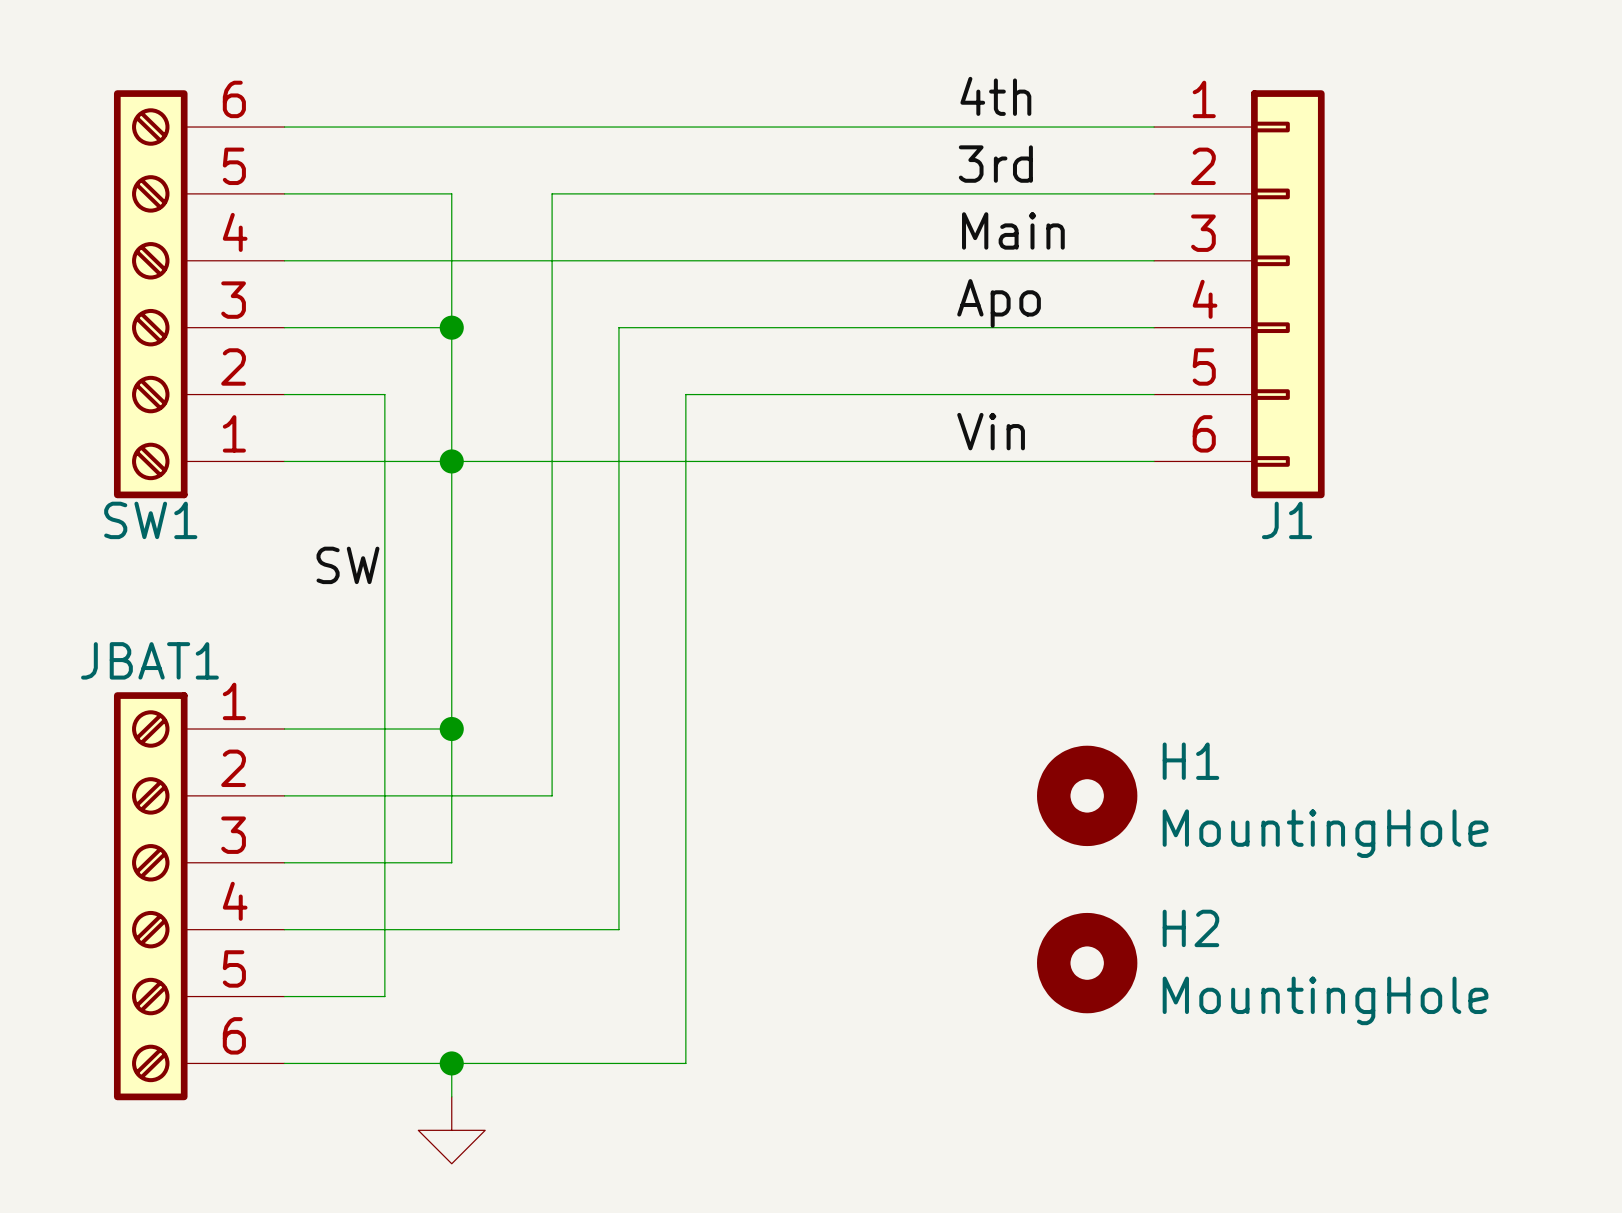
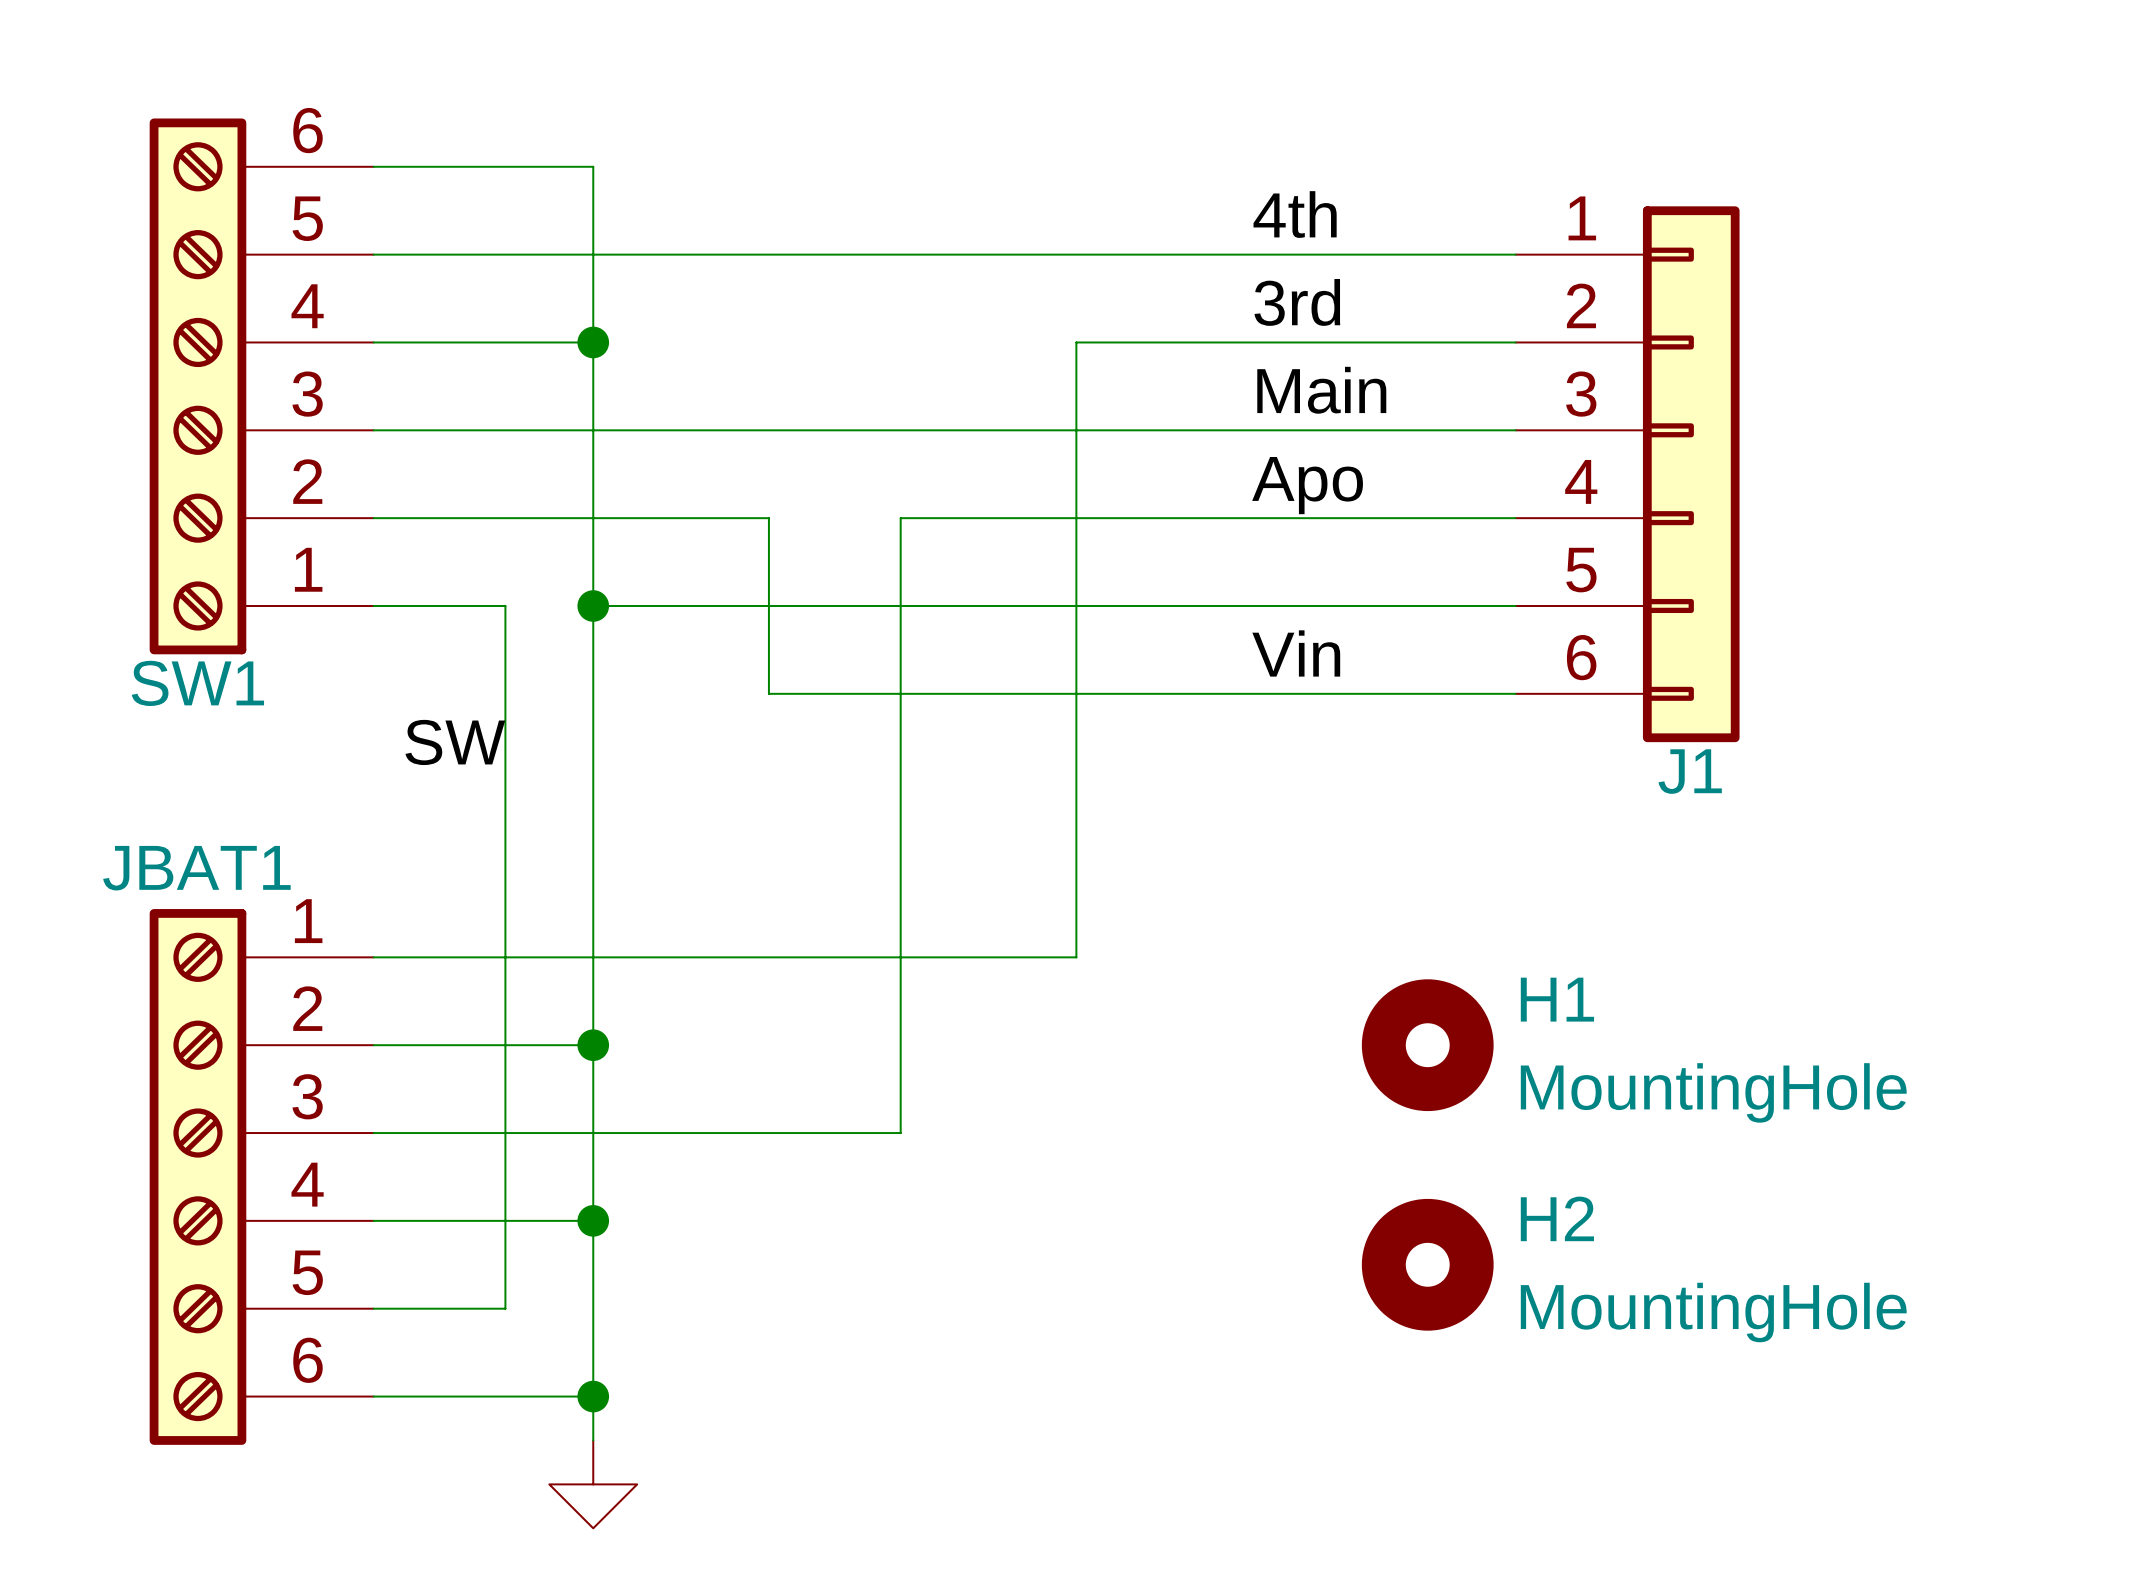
label: 4th (995, 96) -> none
wire: (451, 127) (1154, 127) -> (593, 166) (593, 254) (725, 254)
label: 3rd (995, 164) -> 4th (1295, 214)
wire: (552, 193) (552, 795) (451, 795) -> none
label: Main (1013, 230) -> 3rd (1297, 302)
wire: (451, 260) (819, 260) -> (593, 957) (1076, 957) (1076, 342)
J1 position: (1239, 294) -> (1627, 474)
label: Apo (999, 303) -> Main (1321, 390)
junction position: (451, 327) -> (593, 342)
wire: (618, 327) (618, 929) (451, 929) -> (812, 430) (593, 430)
label: none -> Apo (1307, 485)
wire: (384, 394) (384, 461) (451, 461) -> (505, 518) (768, 518) (768, 693) (1515, 693)
label position: Vin (991, 431) -> Vin (1296, 653)
junction position: (451, 729) -> (593, 1045)
wire: (685, 862) (685, 1063) (451, 1063) -> (900, 1133) (593, 1133) (593, 1396)
junction: none -> (593, 1220)

